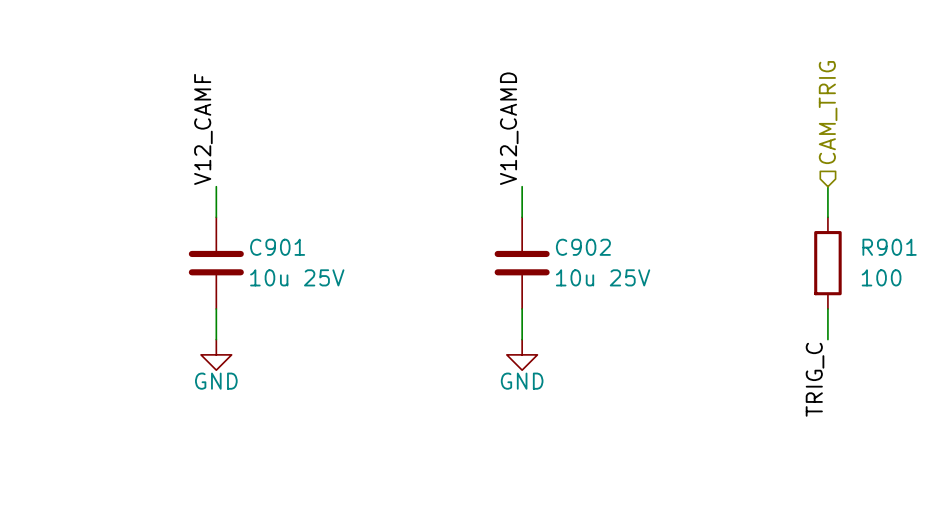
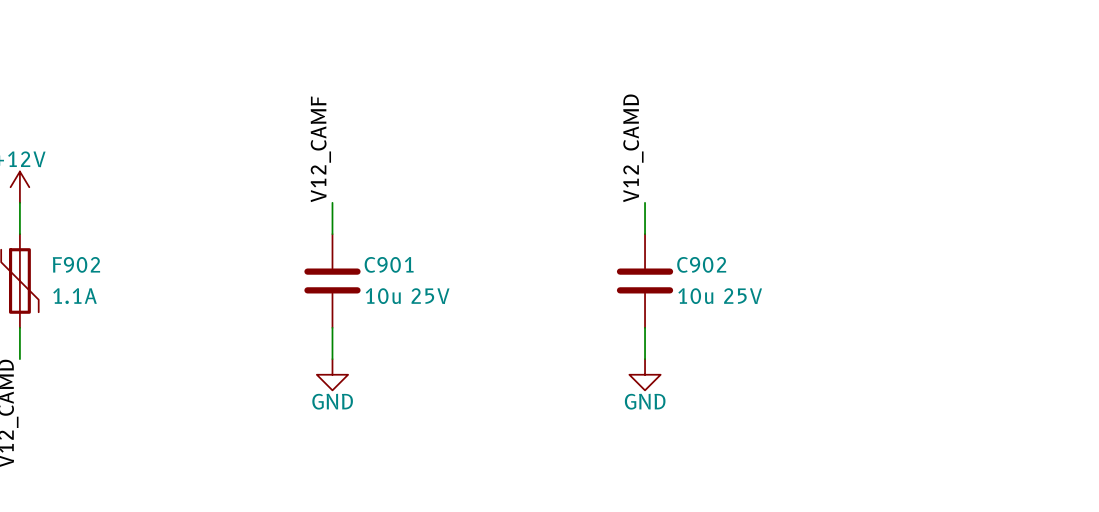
hierarchical label: CAM_TRIG (828, 112) -> none
wire: (827, 186) (827, 217) -> none
R901: 100 (827, 263) -> none
wire: (827, 309) (827, 339) -> none
label: TRIG_C (815, 379) -> none

